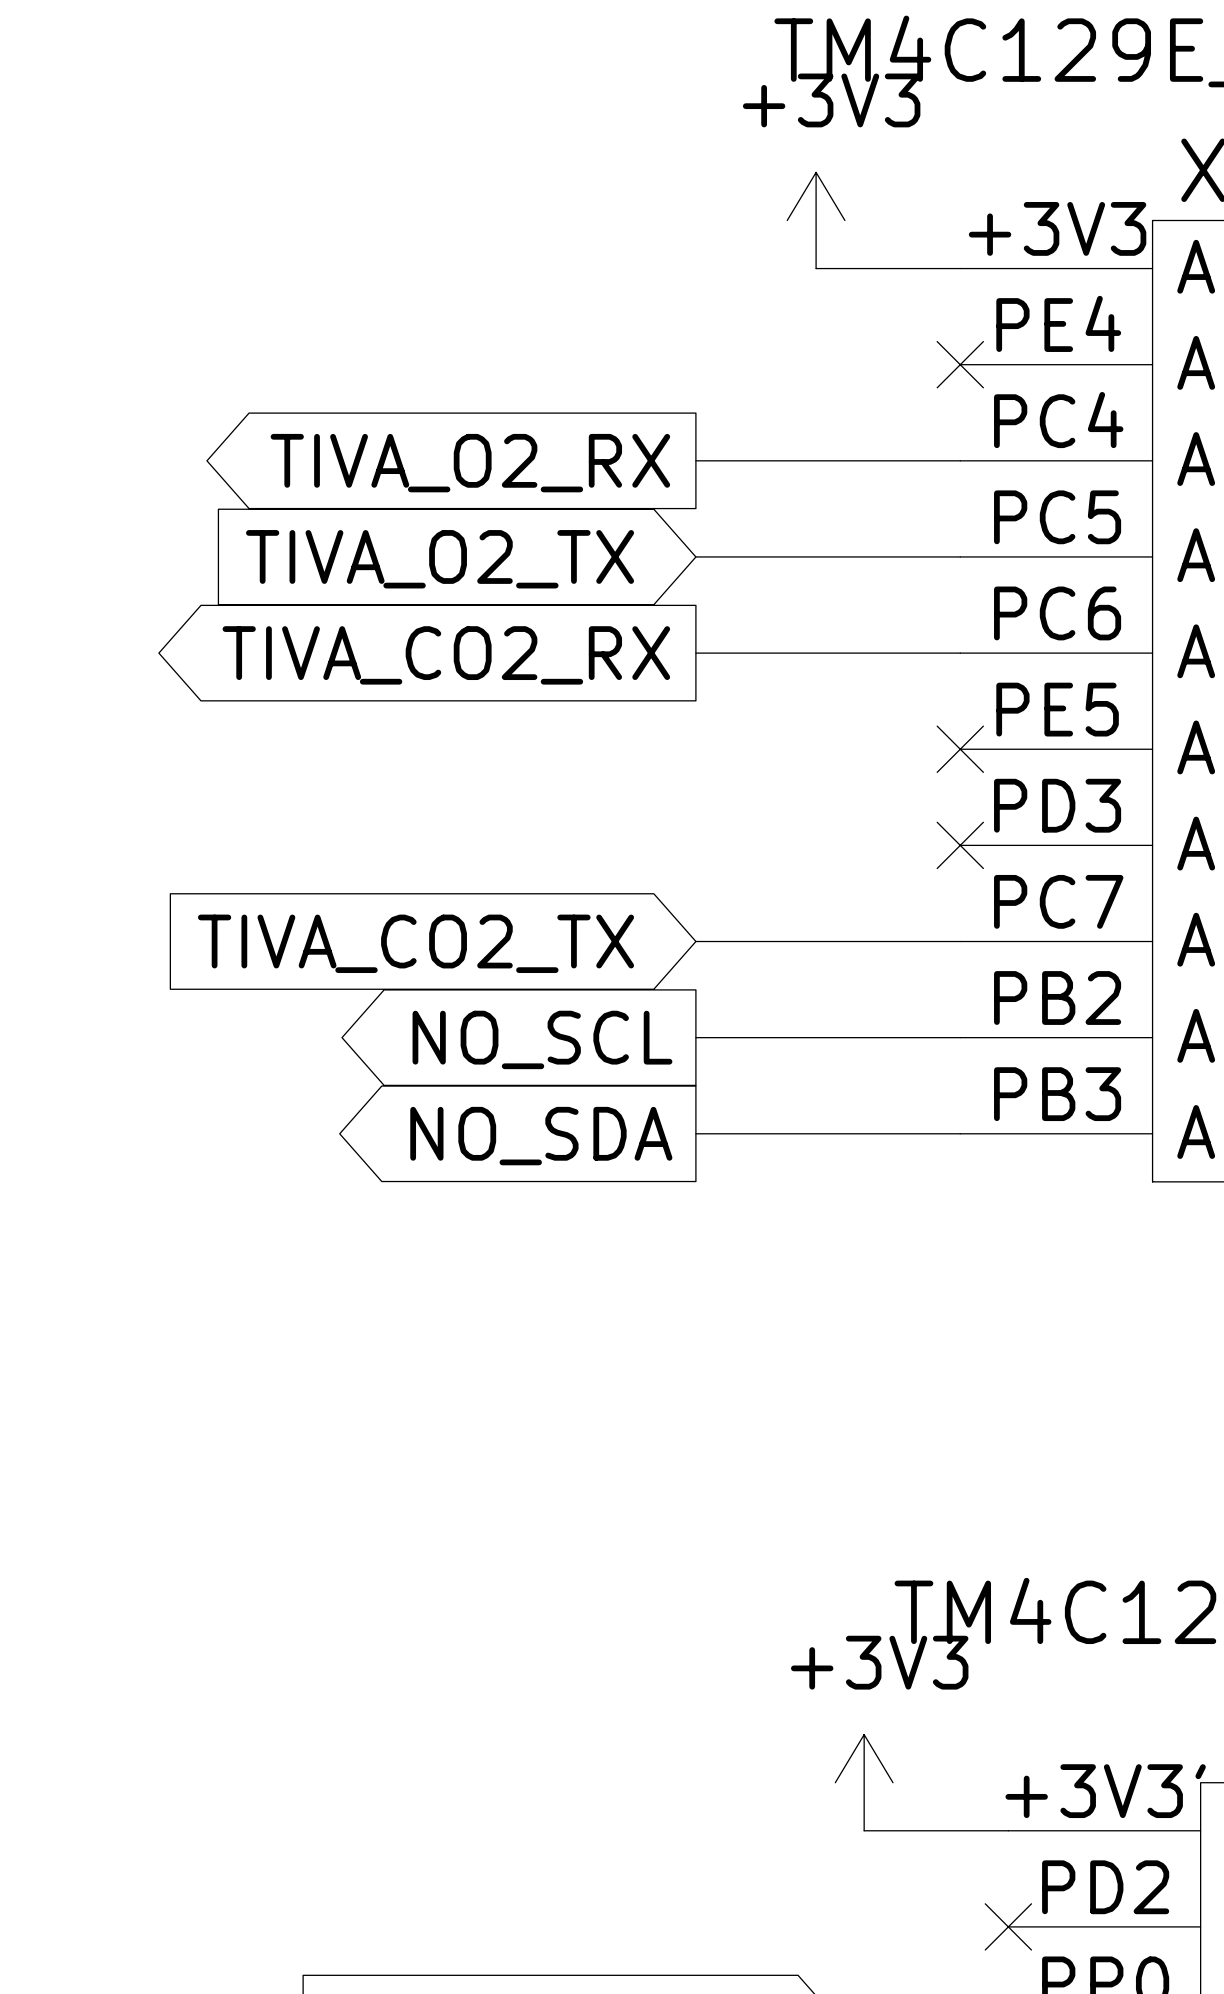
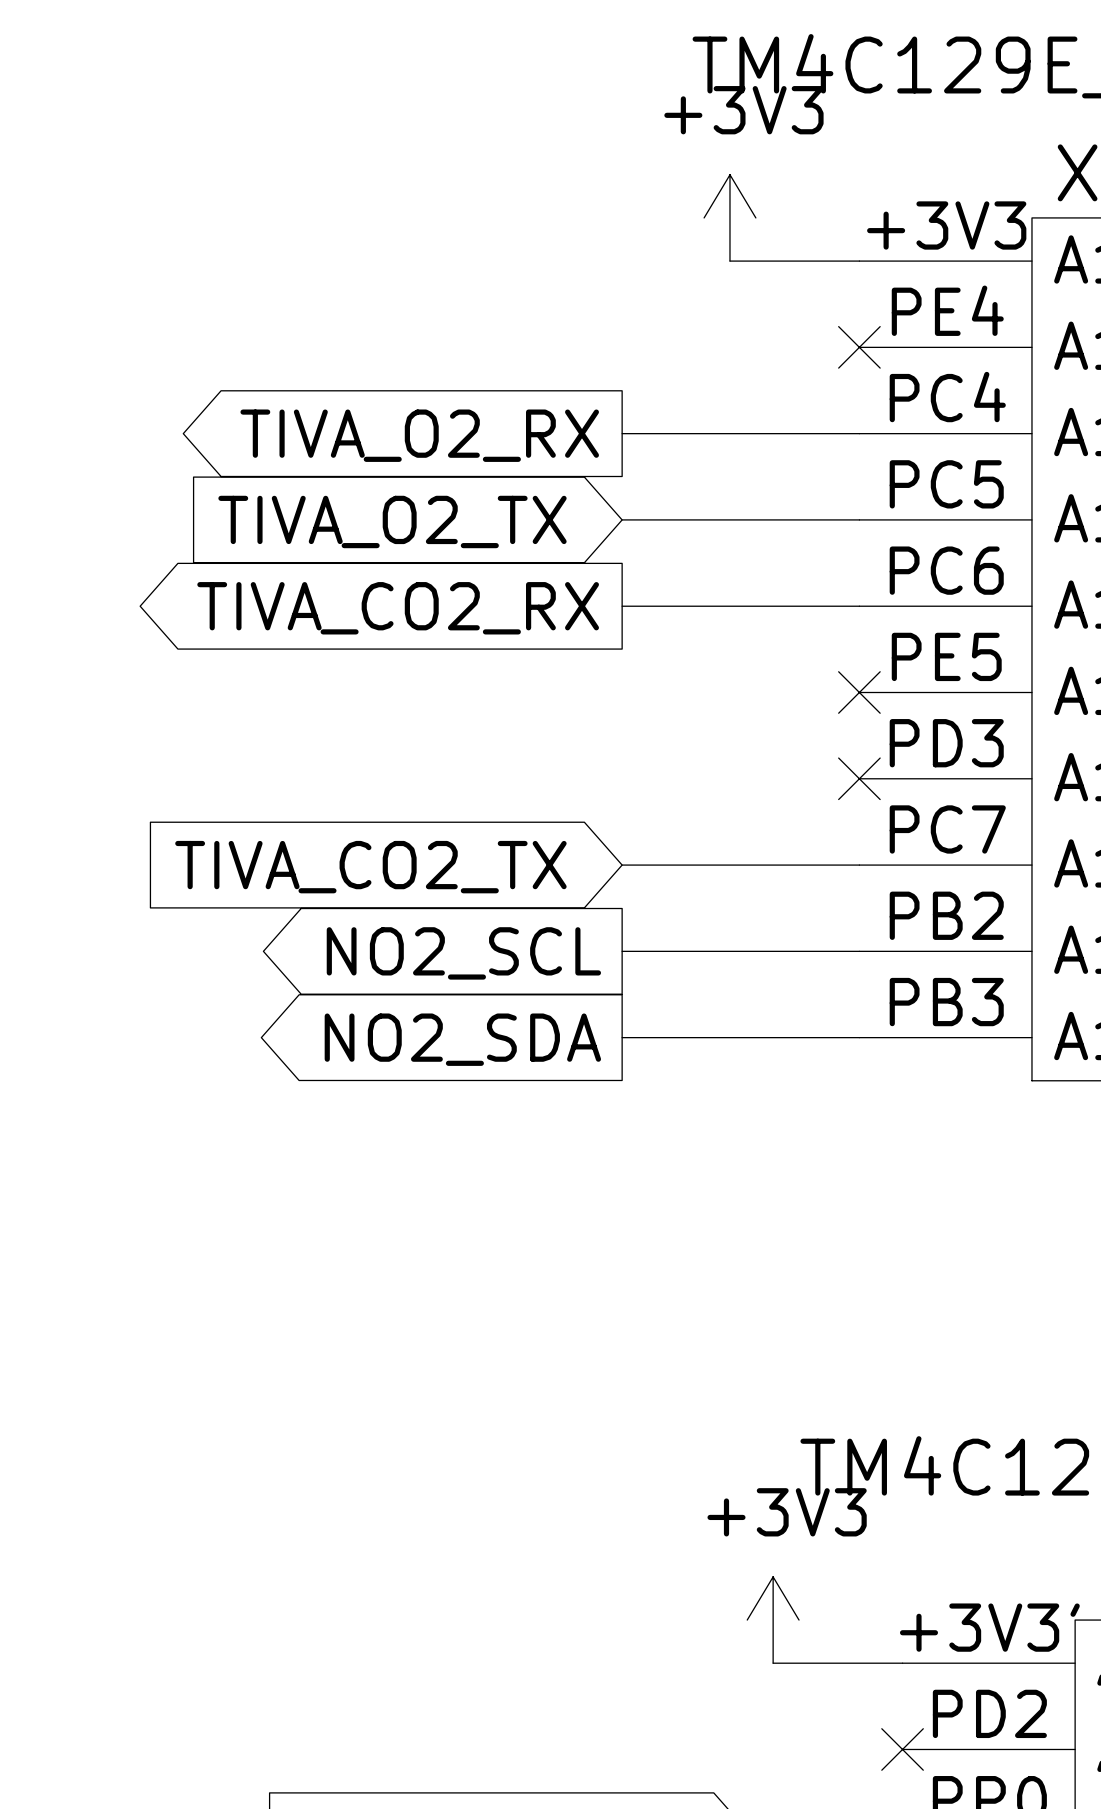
global label: NO_SCL (542, 1039) -> NO2_SCL (463, 953)
global label: NO_SDA (541, 1136) -> NO2_SDA (462, 1039)

